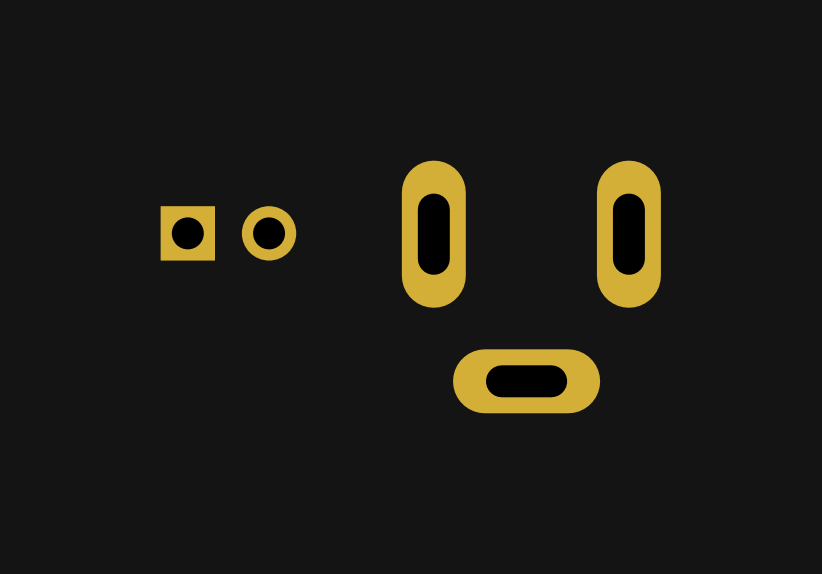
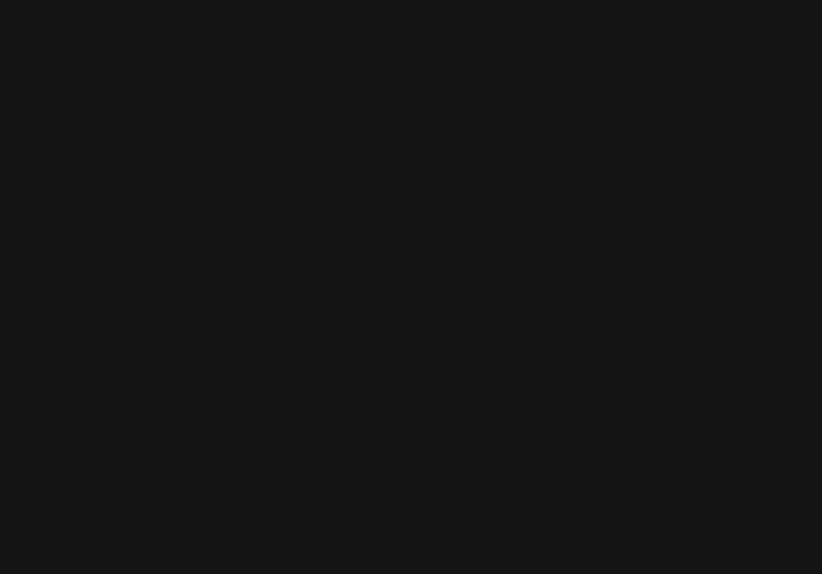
part: (228, 233) -> none
part: (531, 286) -> none

